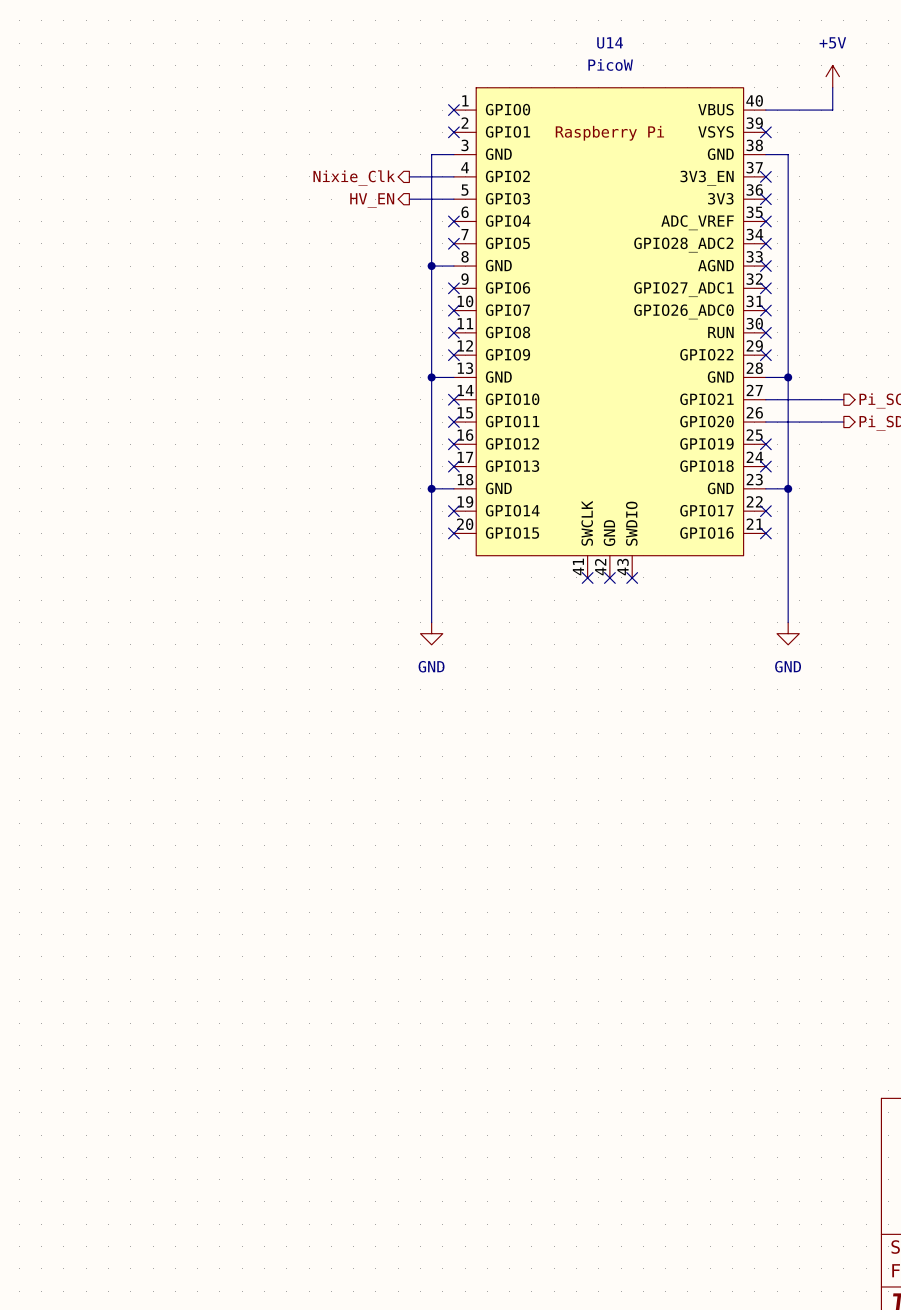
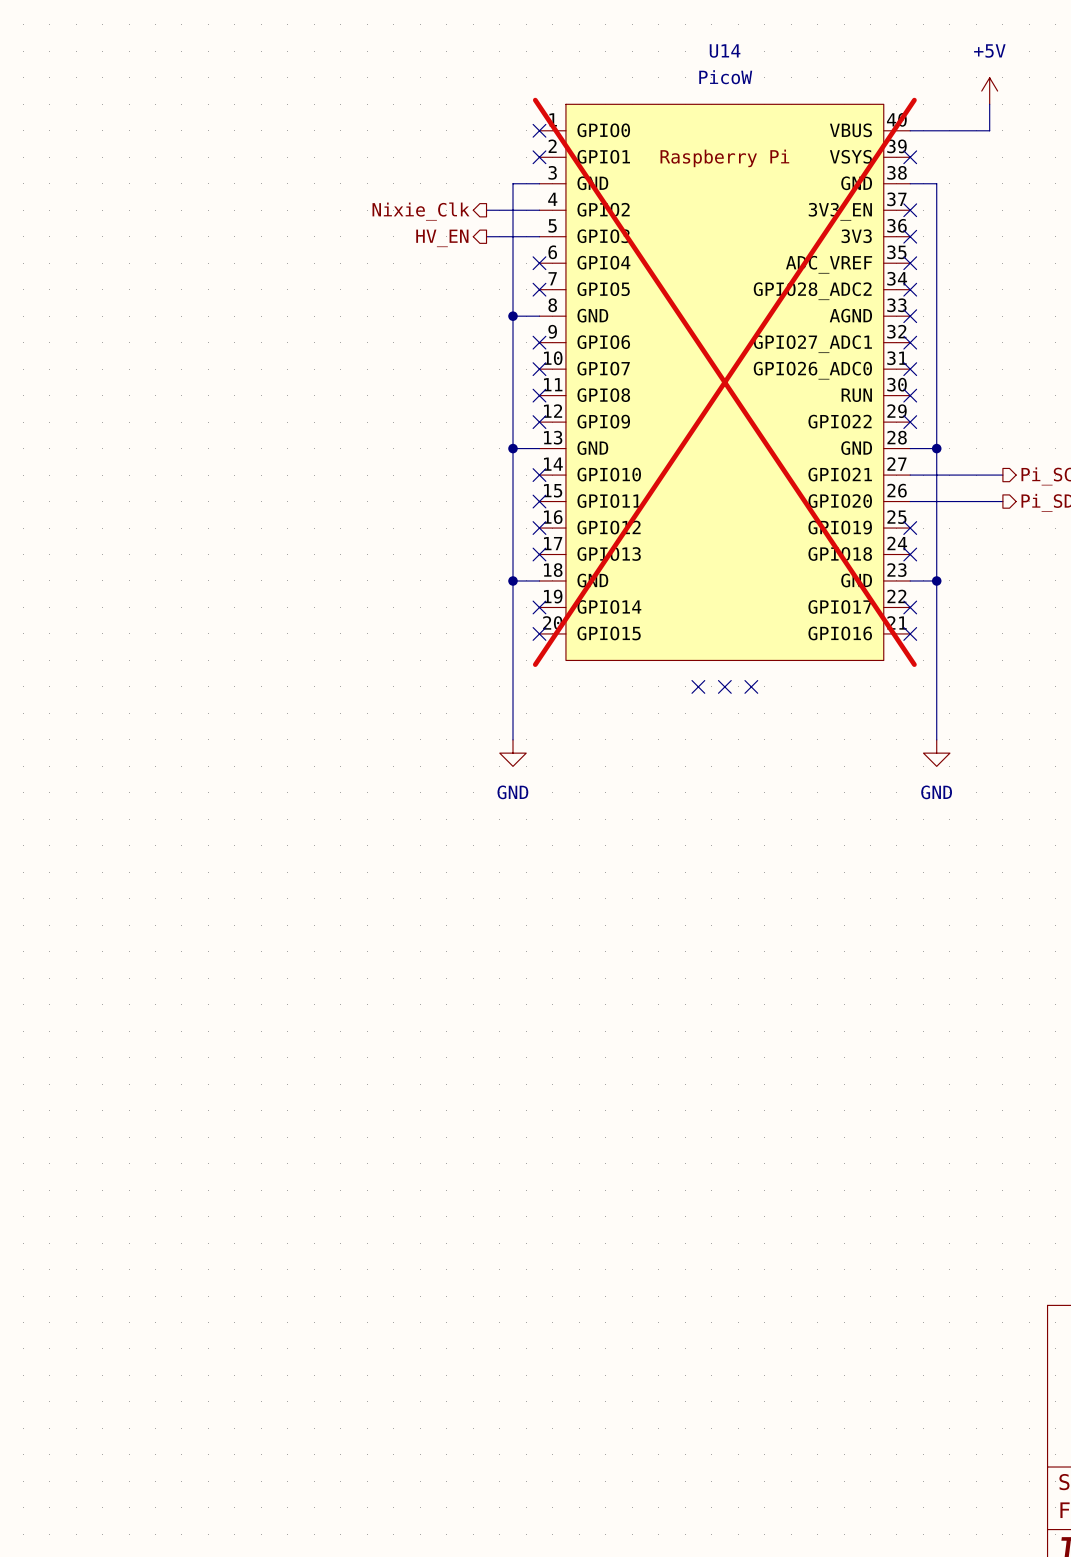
U14 symbol: [453, 87, 766, 578] -> [539, 104, 911, 661]
U14 do-not-place cross: none -> (724, 382)

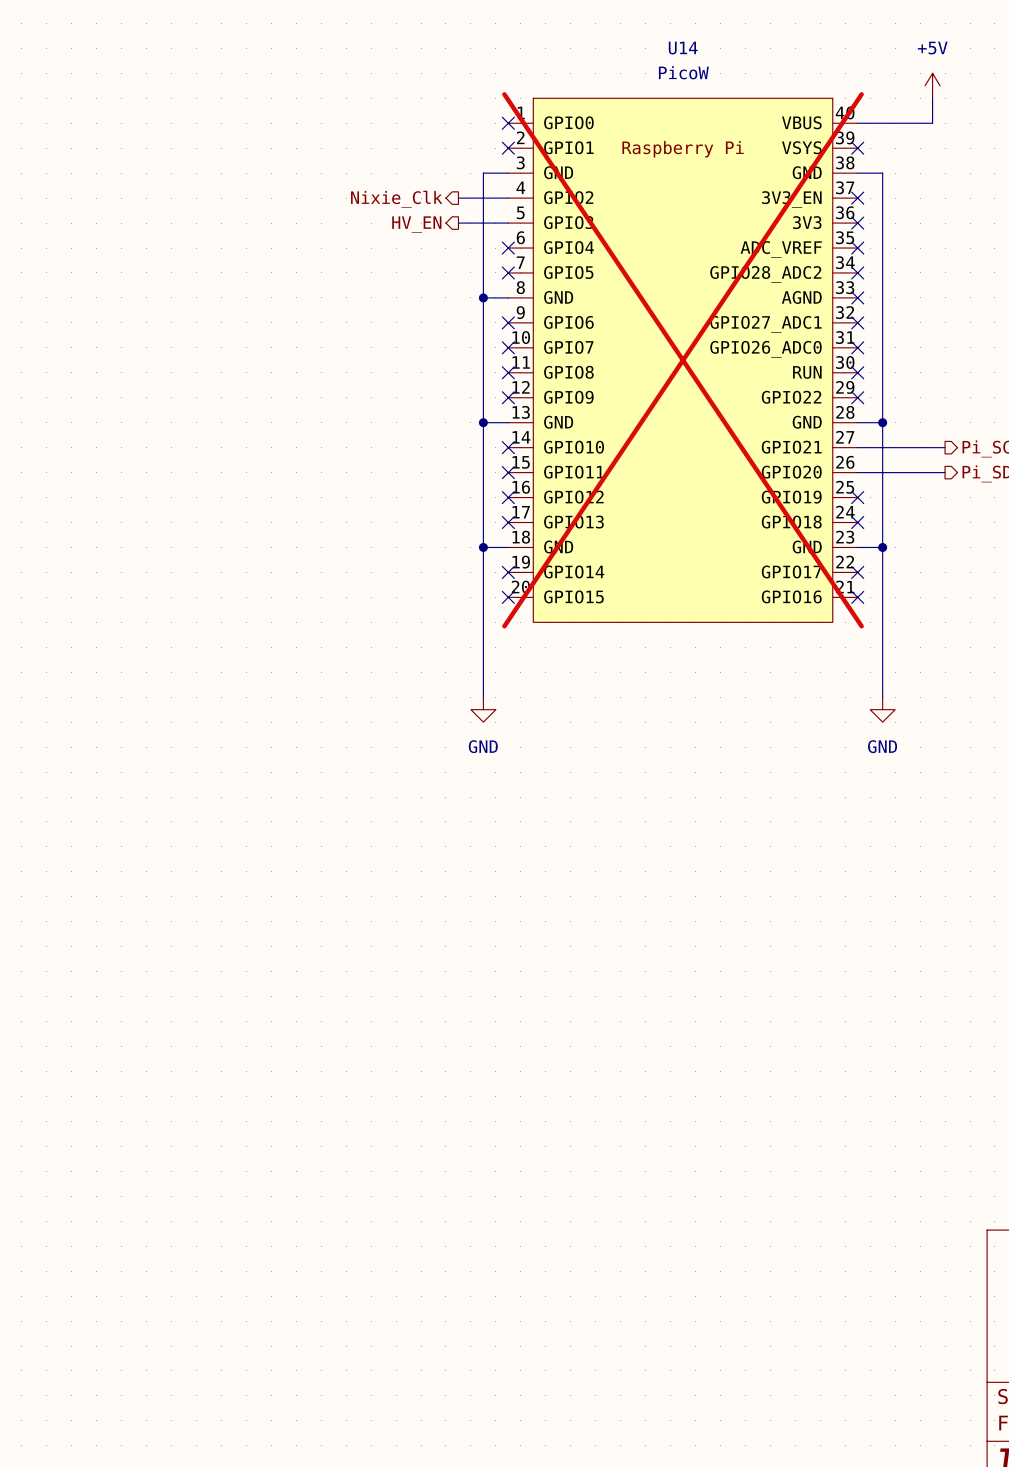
no-connect mark: (698, 686) -> none
no-connect mark: (724, 686) -> none
no-connect mark: (751, 686) -> none

